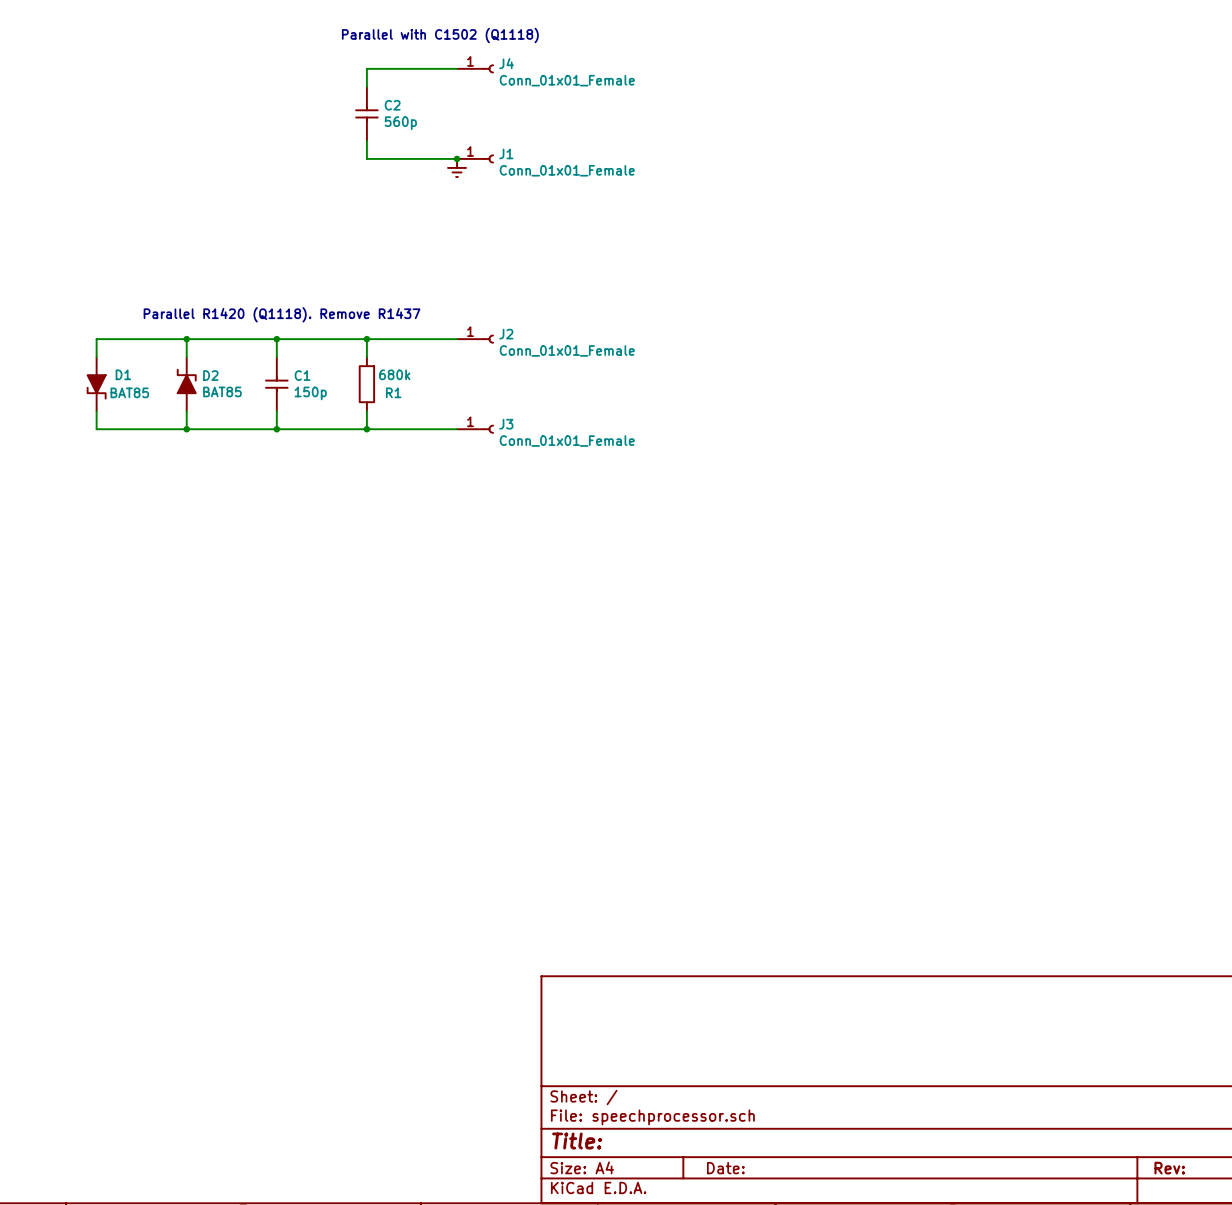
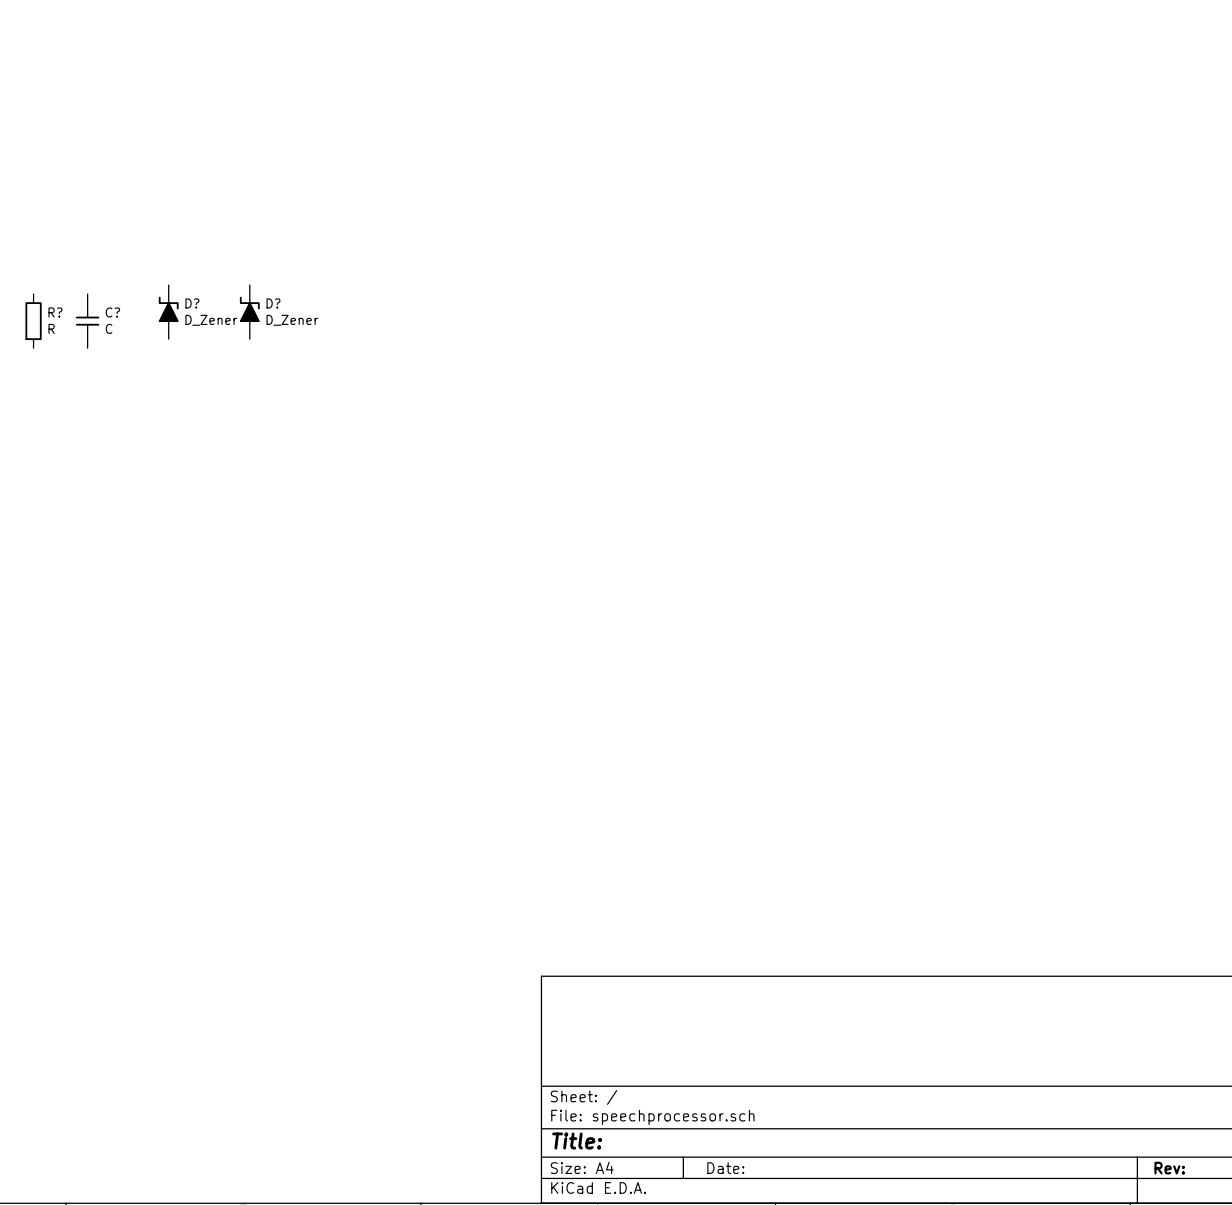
text: Parallel with C1502 (Q1118) (440, 35) -> none
wire: (457, 68) (366, 68) (366, 86) -> none
J4: Conn_01x01_Female (475, 68) -> none
C2: 560p (366, 113) -> none
wire: (366, 140) (366, 158) (457, 158) -> none
junction: (457, 158) -> none
J1: Conn_01x01_Female (475, 158) -> none
power symbol: (457, 167) -> none
D?: none -> D_Zener (168, 312)
D?: none -> D_Zener (249, 312)
text: Parallel R1420 (Q1118). Remove R1437 (282, 314) -> none
R?: none -> R (33, 321)
C?: none -> C (87, 321)
wire: (186, 339) (186, 357) -> none
junction: (186, 339) -> none
wire: (276, 339) (276, 357) -> none
junction: (276, 339) -> none
wire: (366, 339) (366, 357) -> none
junction: (366, 339) -> none
wire: (457, 339) (96, 339) (96, 357) -> none
J2: Conn_01x01_Female (475, 339) -> none
D1: BAT85 (96, 384) -> none
D2: BAT85 (186, 384) -> none
C1: 150p (276, 384) -> none
R1: 680k (366, 384) -> none
wire: (96, 411) (96, 429) (457, 429) -> none
wire: (186, 411) (186, 429) -> none
wire: (276, 411) (276, 429) -> none
wire: (366, 411) (366, 429) -> none
junction: (186, 429) -> none
junction: (276, 429) -> none
junction: (366, 429) -> none
J3: Conn_01x01_Female (475, 429) -> none

